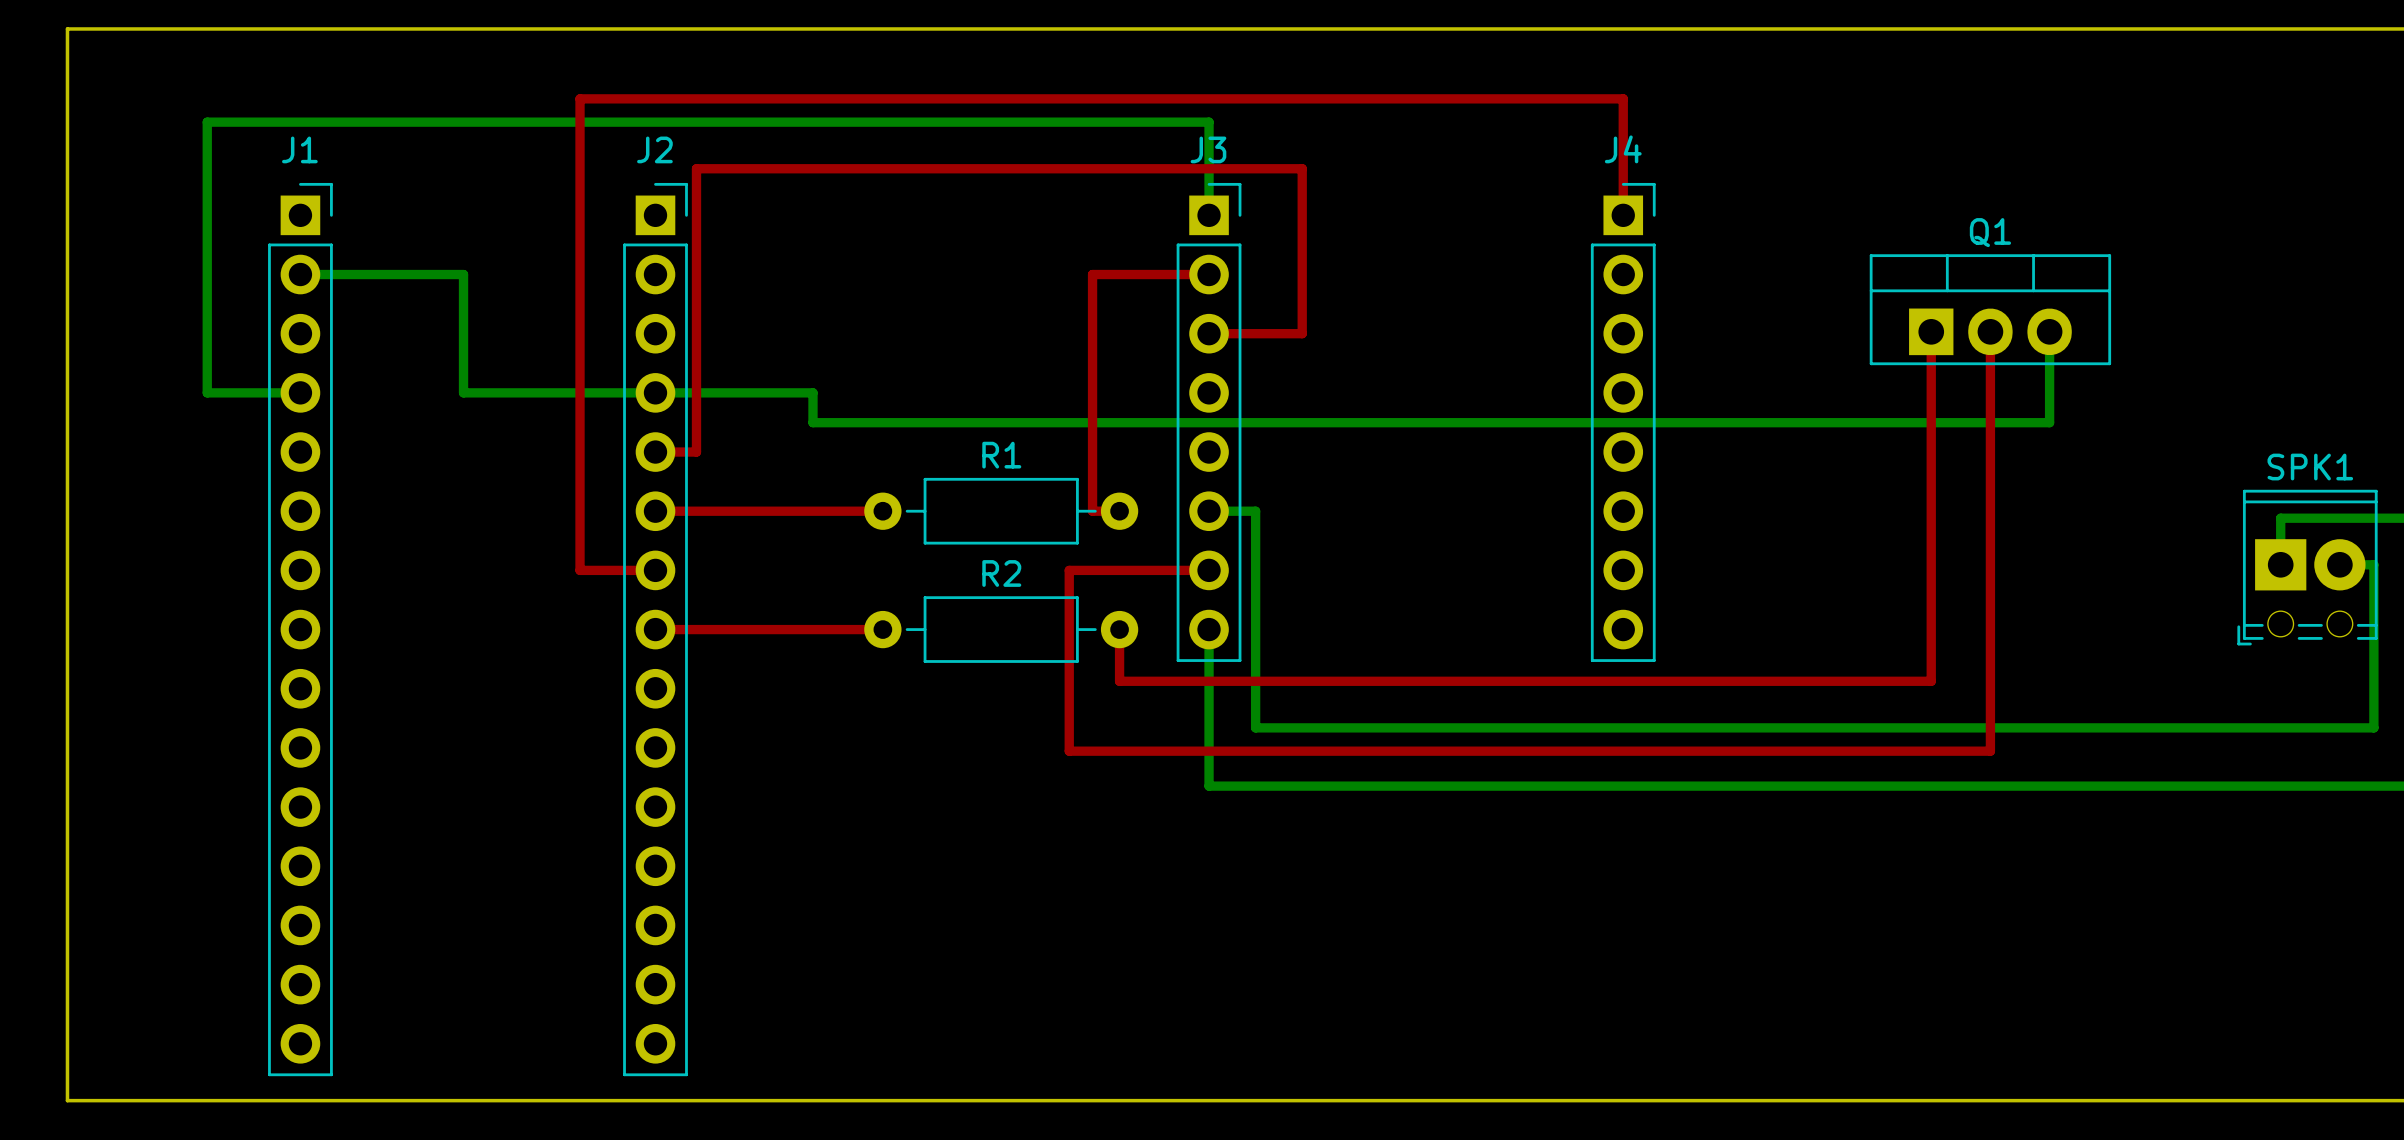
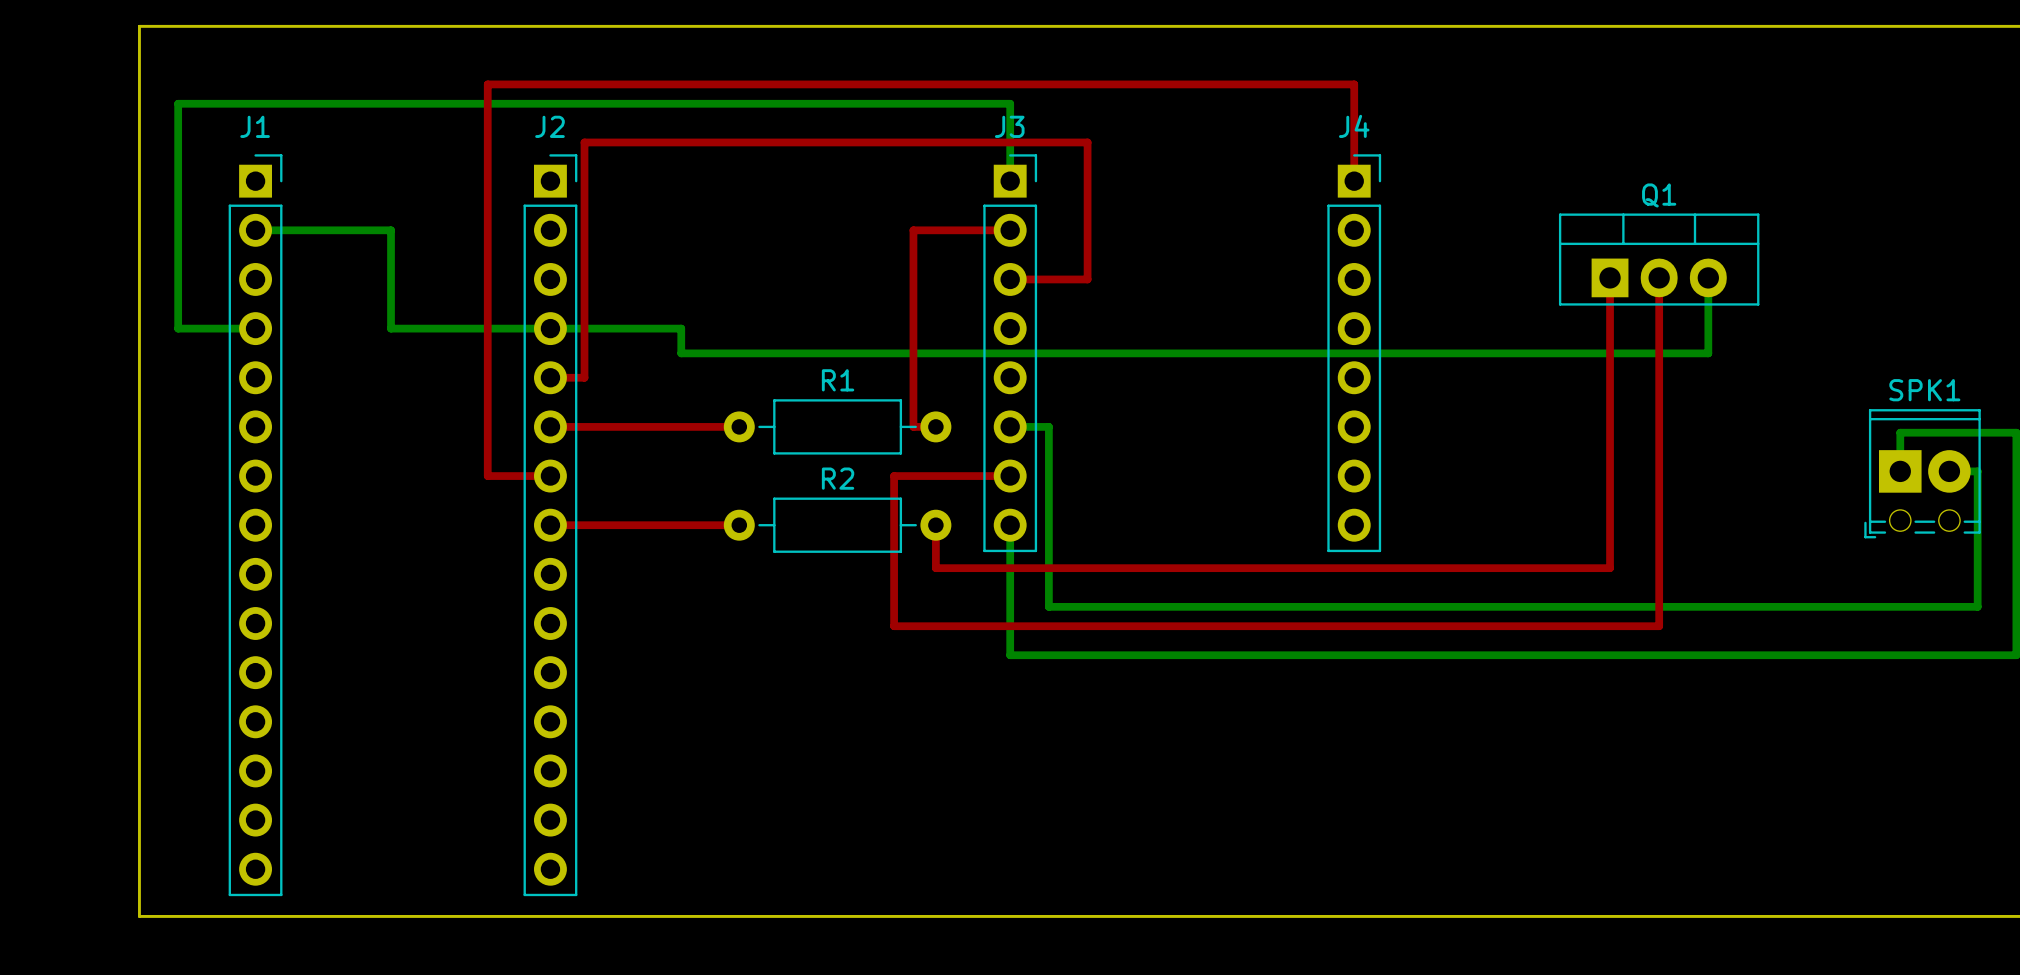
board edge: (160, 28) (67, 28) (67, 1100) (160, 1100) -> (139, 26) (139, 916)

